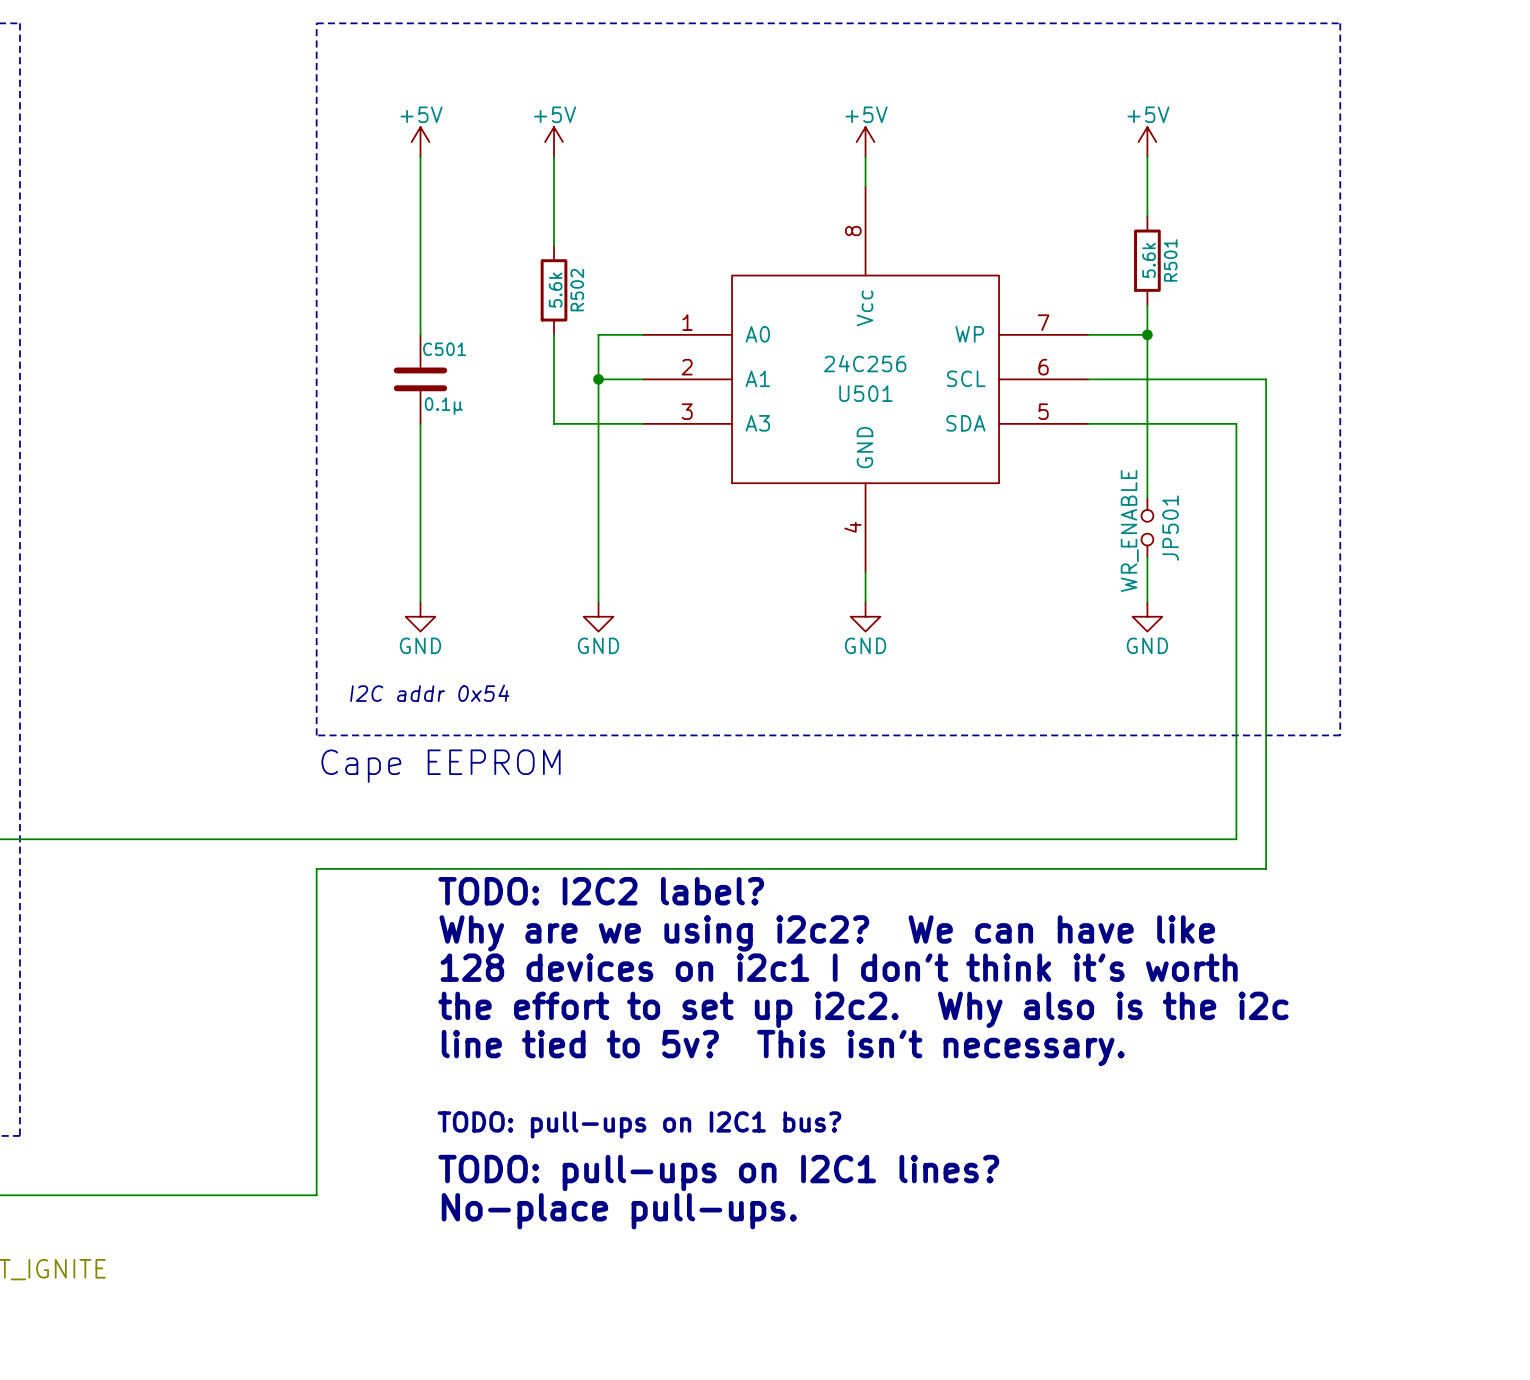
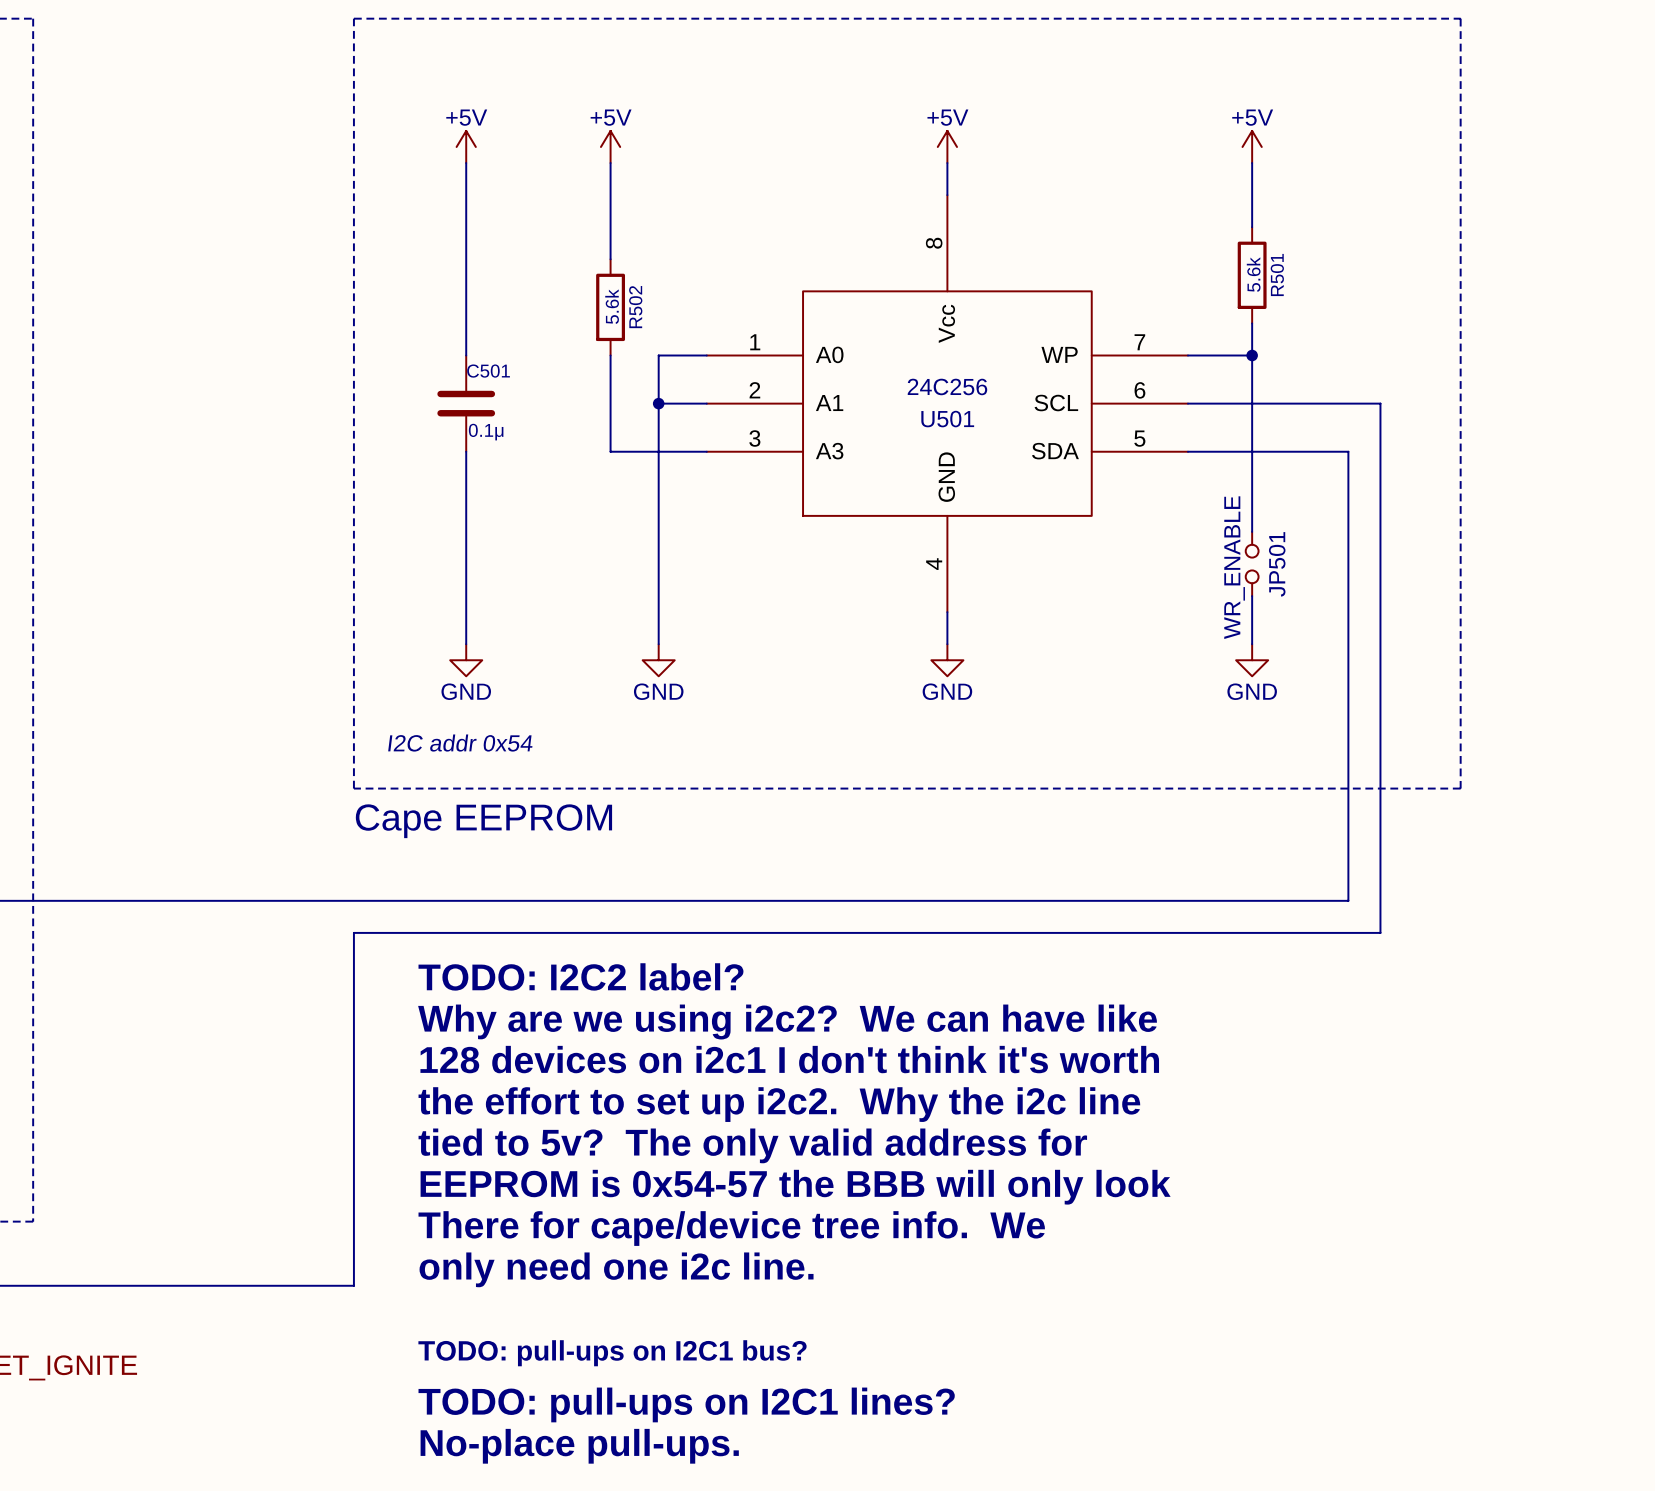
text position: TODO: I2C2 label? (601, 891) -> TODO: I2C2 label? (580, 976)
text position: Why are we using i2c2? We can have like (827, 933) -> Why are we using i2c2? We can have like (787, 1022)
text position: 128 devices on i2c1 I don't think it's worth (839, 967) -> 128 devices on i2c1 I don't think it's worth (789, 1059)
text: the effort to set up i2c2. Why also is the i2c (863, 1009) -> the effort to set up i2c2. Why the i2c line (779, 1104)
text: line tied to 5v? This isn't necessary. (783, 1048) -> none
text: none -> tied to 5v? The only valid address for (752, 1145)
text: none -> EEPROM is 0x54-57 the BBB will only look (795, 1187)
text position: TODO: pull-ups on I2C1 bus? (639, 1124) -> TODO: pull-ups on I2C1 bus? (612, 1353)
text: none -> There for cape/device tree info. We (731, 1228)
text position: TODO: pull-ups on I2C1 lines? (718, 1173) -> TODO: pull-ups on I2C1 lines? (686, 1404)
text: none -> only need one i2c line. (616, 1269)
text position: No-place pull-ups. (619, 1211) -> No-place pull-ups. (579, 1446)

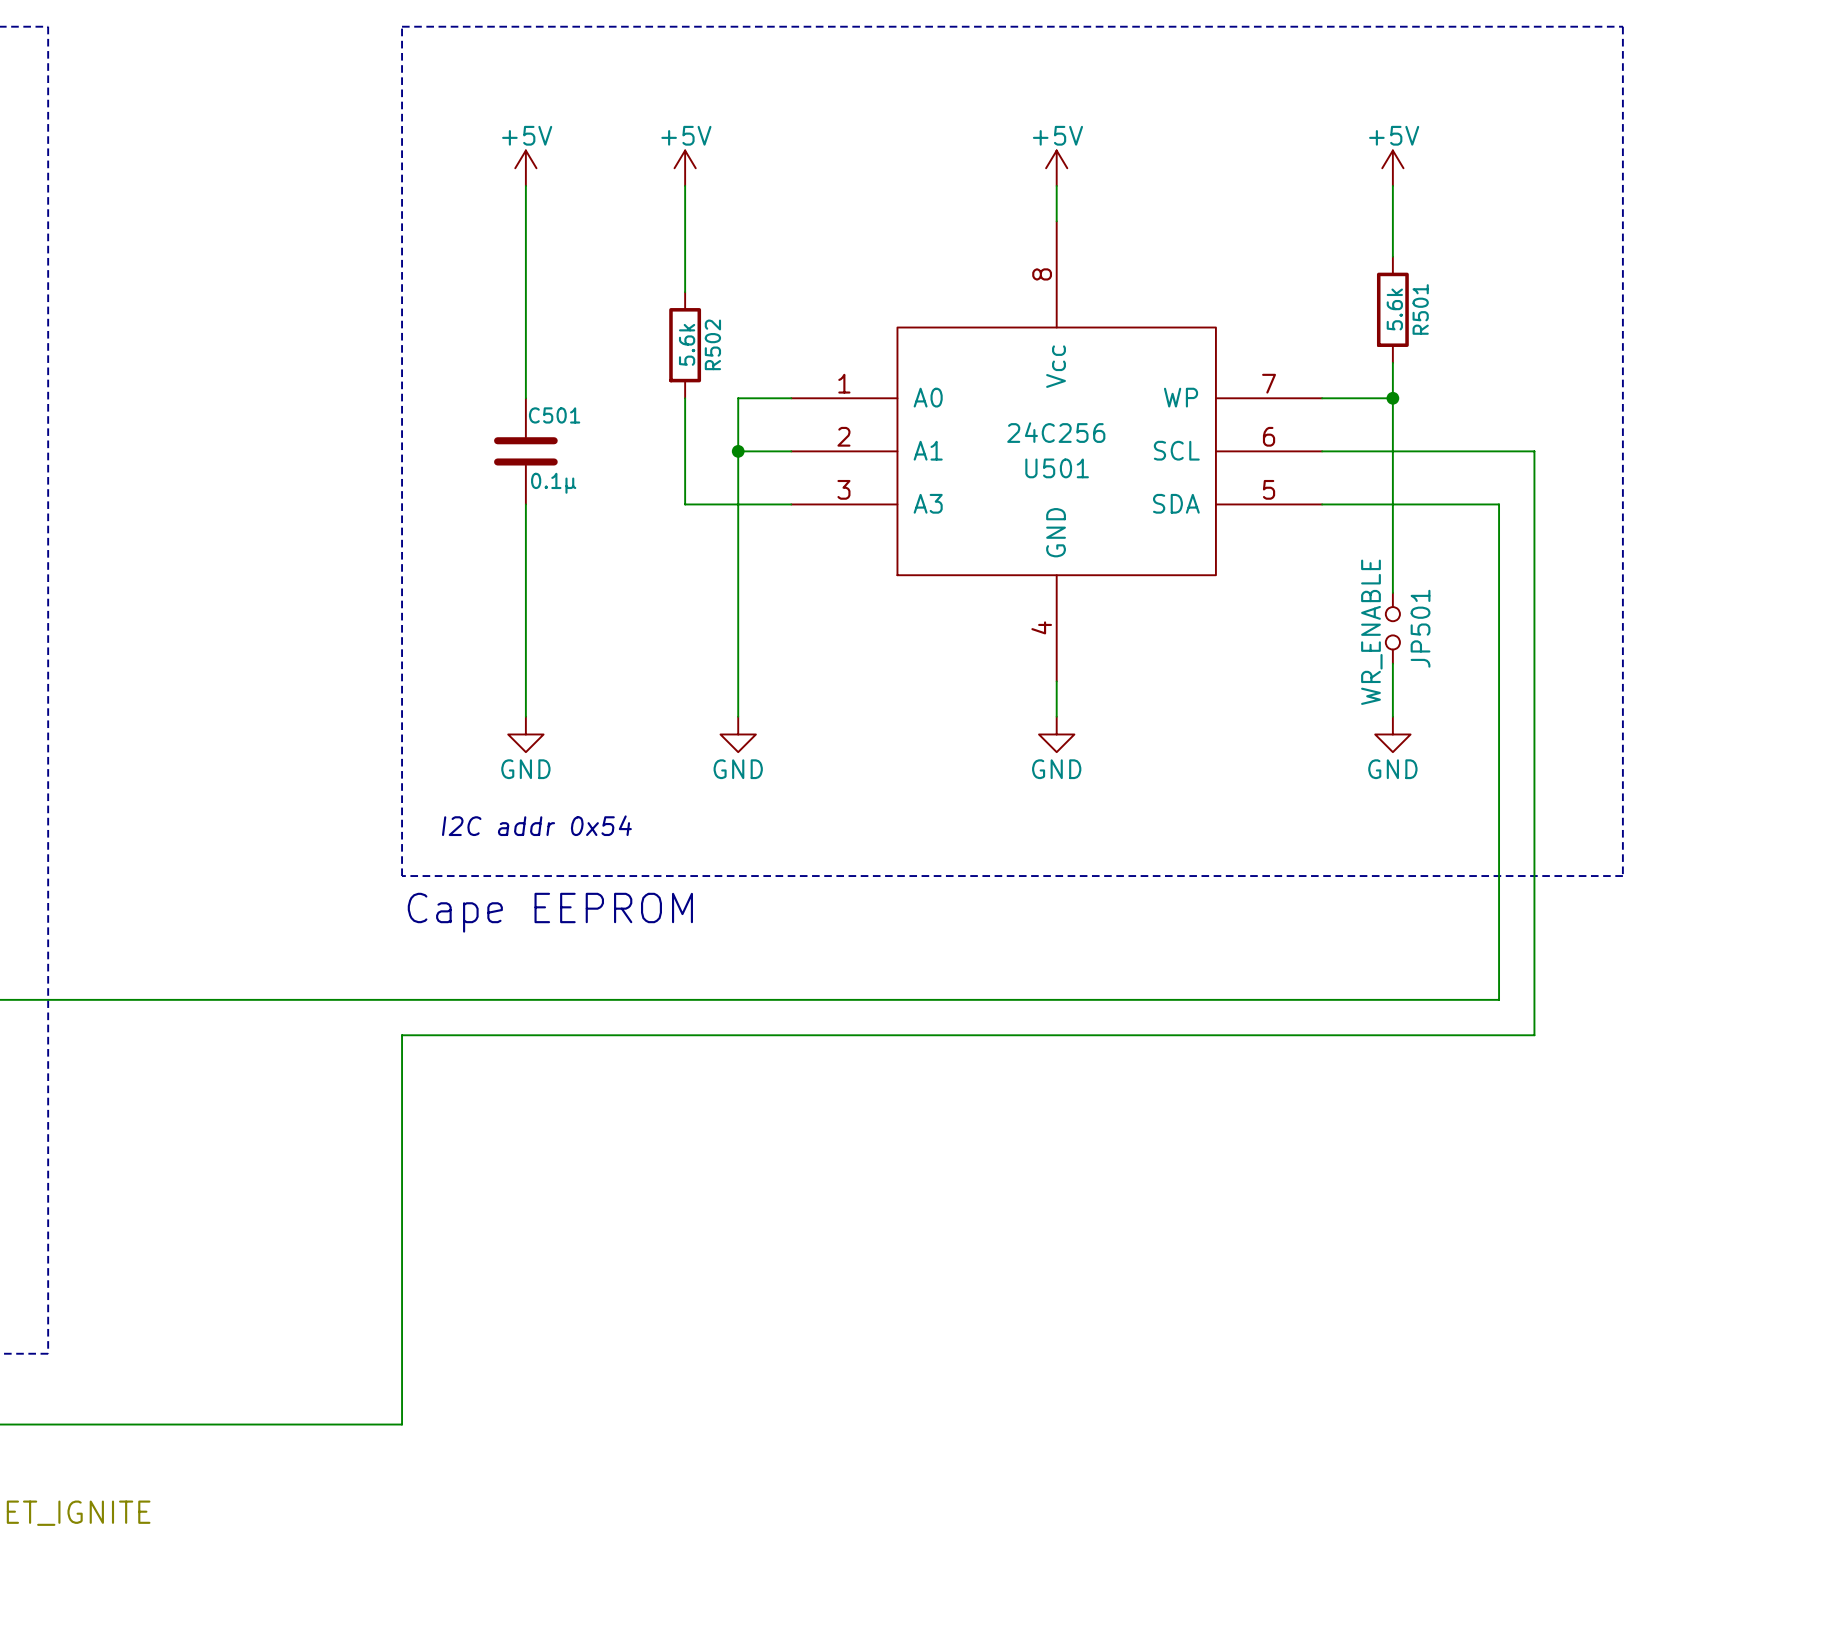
text: TODO: I2C2 label? (580, 976) -> none
text: Why are we using i2c2? We can have like (787, 1022) -> none
text: 128 devices on i2c1 I don't think it's worth (789, 1059) -> none
text: the effort to set up i2c2. Why the i2c line (779, 1104) -> none
text: tied to 5v? The only valid address for (752, 1145) -> none
text: EEPROM is 0x54-57 the BBB will only look (795, 1187) -> none
text: There for cape/device tree info. We (731, 1228) -> none
text: only need one i2c line. (616, 1269) -> none
text: TODO: pull-ups on I2C1 bus? (612, 1353) -> none
text: TODO: pull-ups on I2C1 lines? (686, 1404) -> none
text: No-place pull-ups. (579, 1446) -> none

